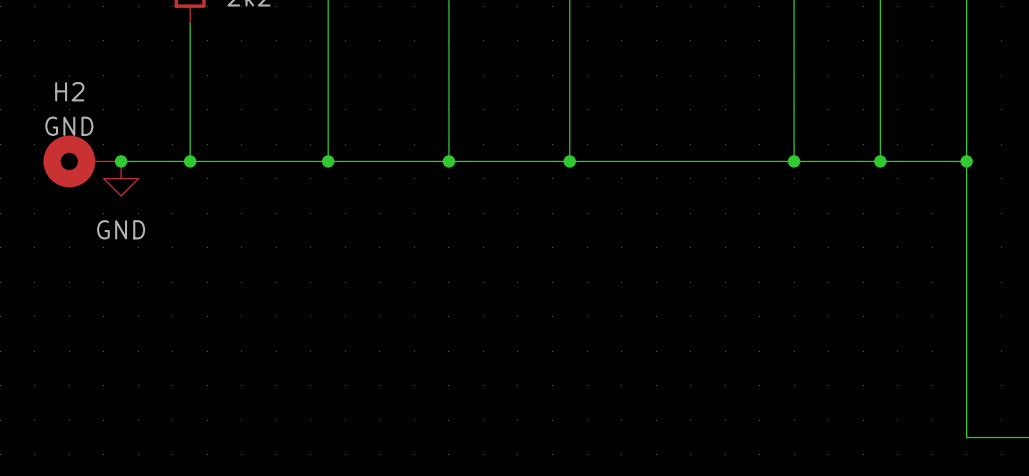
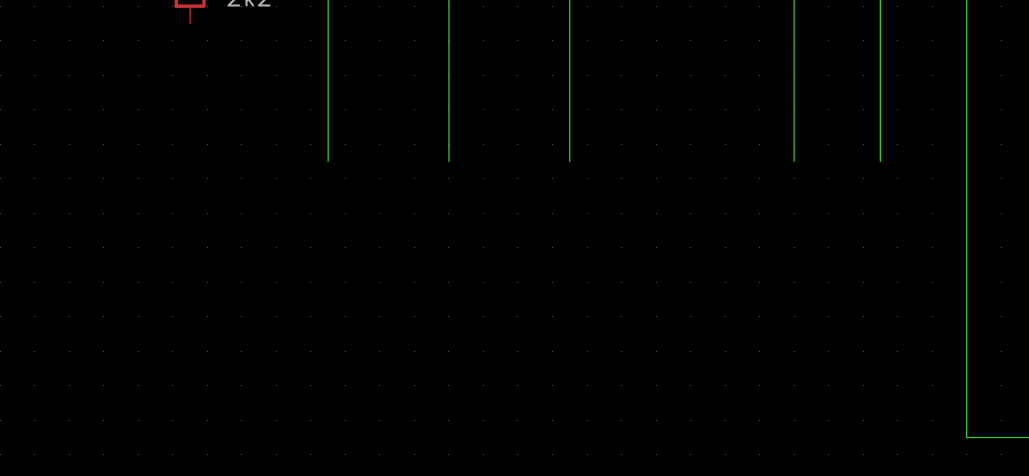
wire: (190, 23) (190, 161) -> none
H2: GND (82, 161) -> none
wire: (121, 161) (966, 161) -> none
junction: (121, 161) -> none
junction: (190, 161) -> none
junction: (328, 161) -> none
junction: (448, 161) -> none
junction: (569, 161) -> none
junction: (794, 161) -> none
junction: (880, 161) -> none
junction: (966, 161) -> none
power symbol: GND (121, 178) -> none

